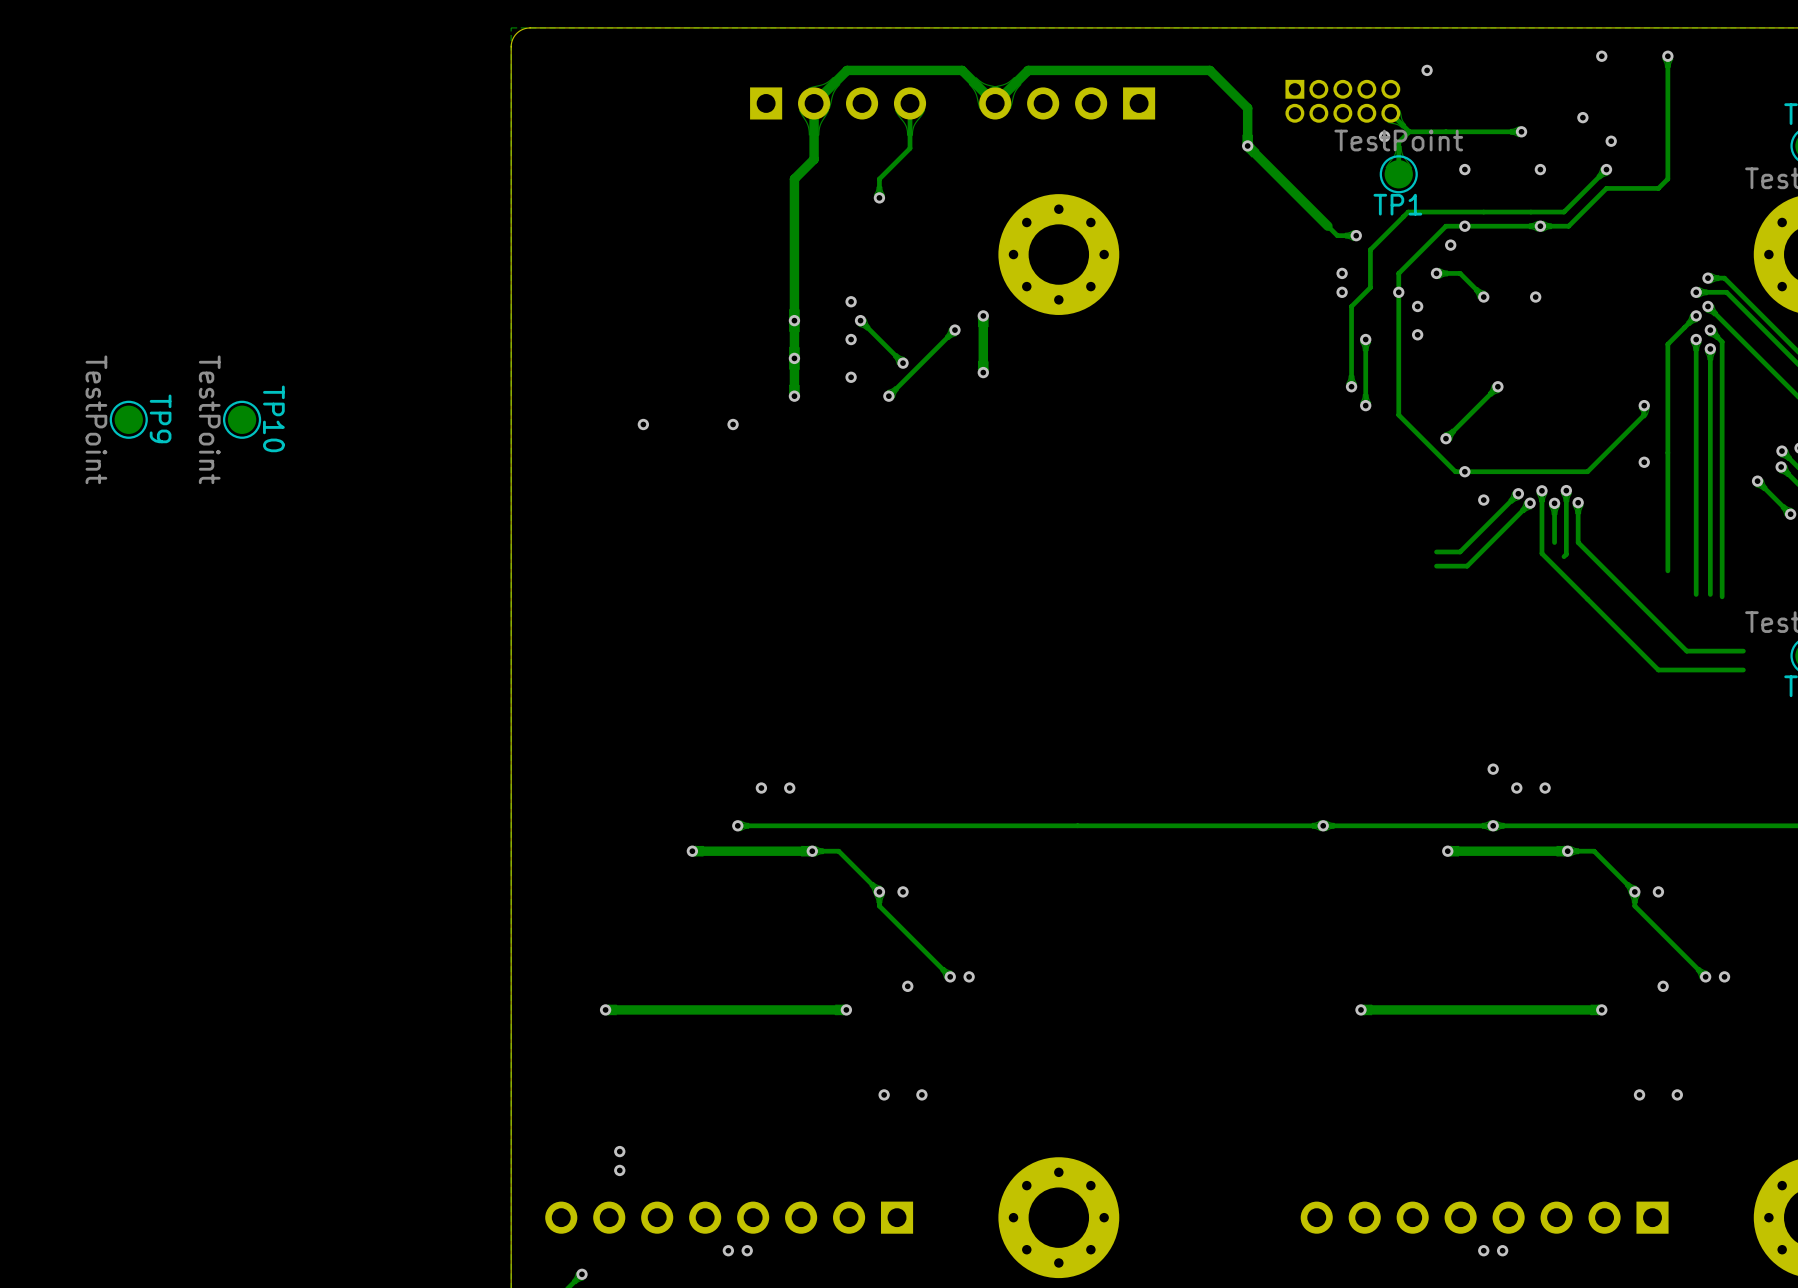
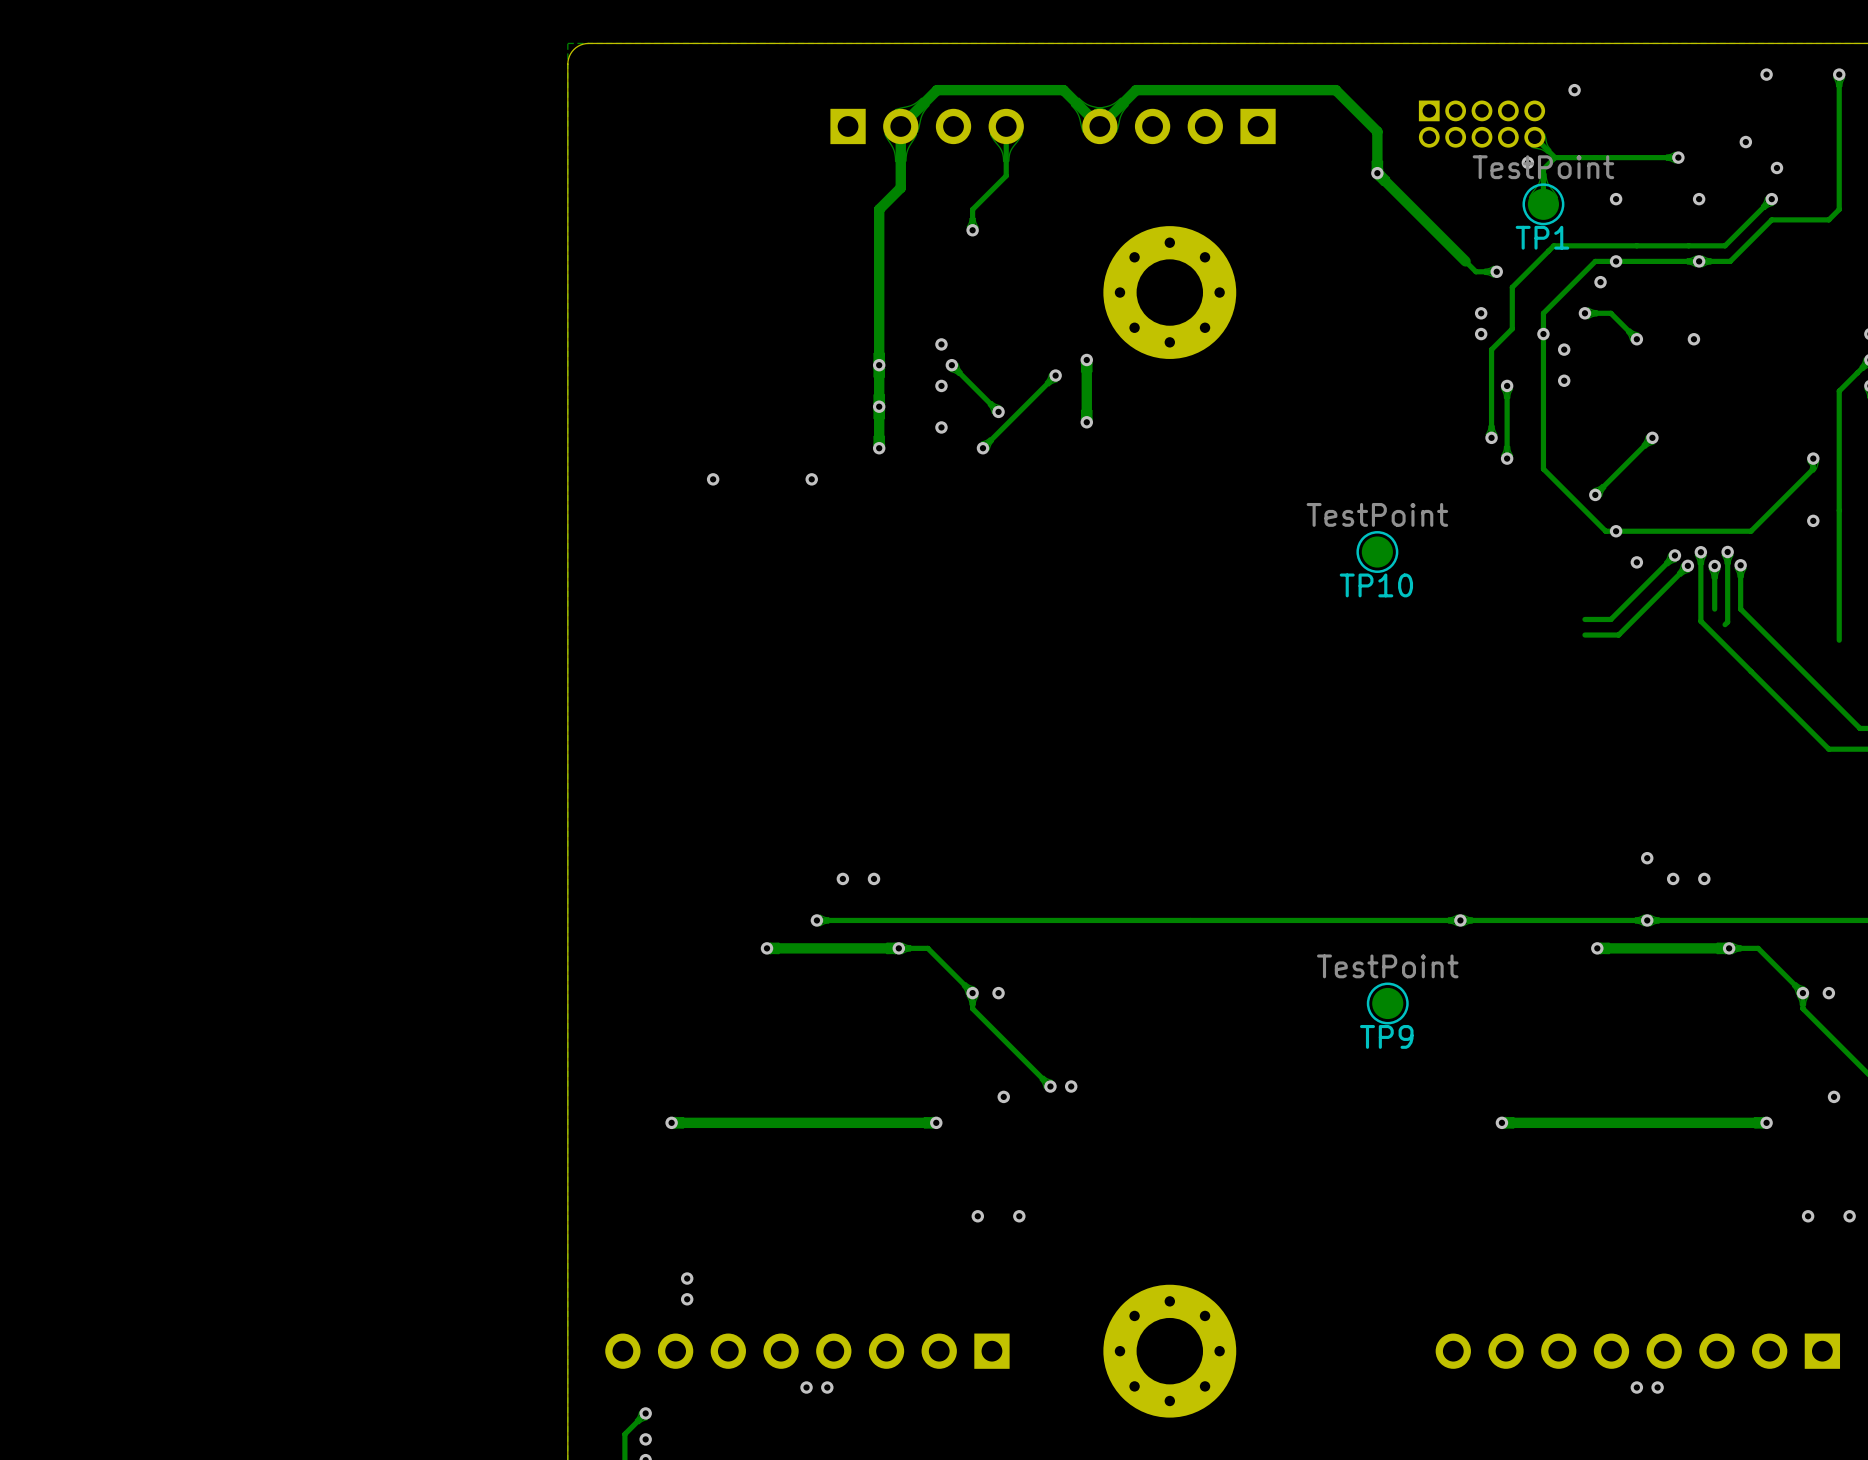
TP9 name rotation: 0° (160, 418) -> 90° counterclockwise (1386, 1036)
TP10 name rotation: 0° (273, 418) -> 90° counterclockwise (1376, 585)
TP9 value rotation: 0° (96, 419) -> 90° counterclockwise (1387, 966)
TP9 position: (128, 419) -> (1387, 1003)
TP10 value rotation: 0° (209, 419) -> 90° counterclockwise (1377, 514)
TP10 position: (242, 419) -> (1377, 552)

